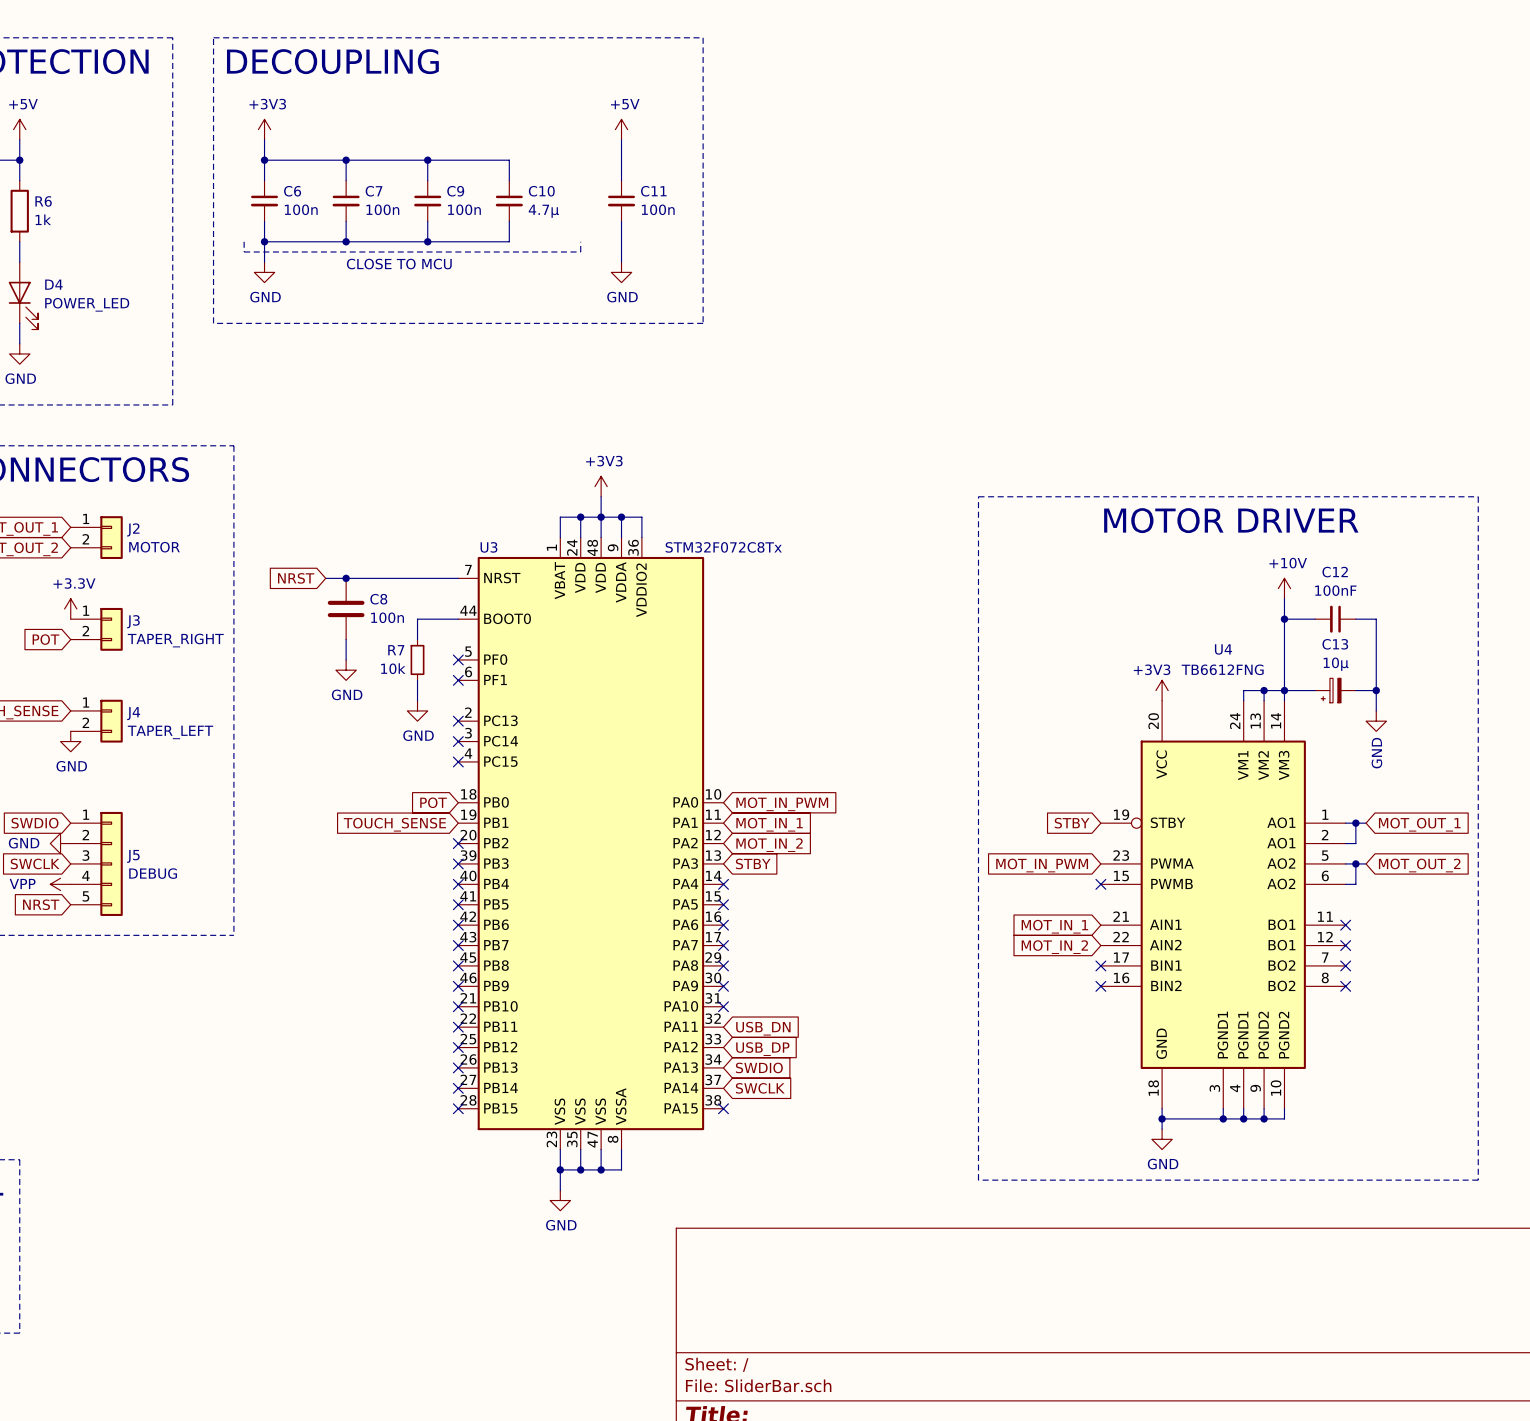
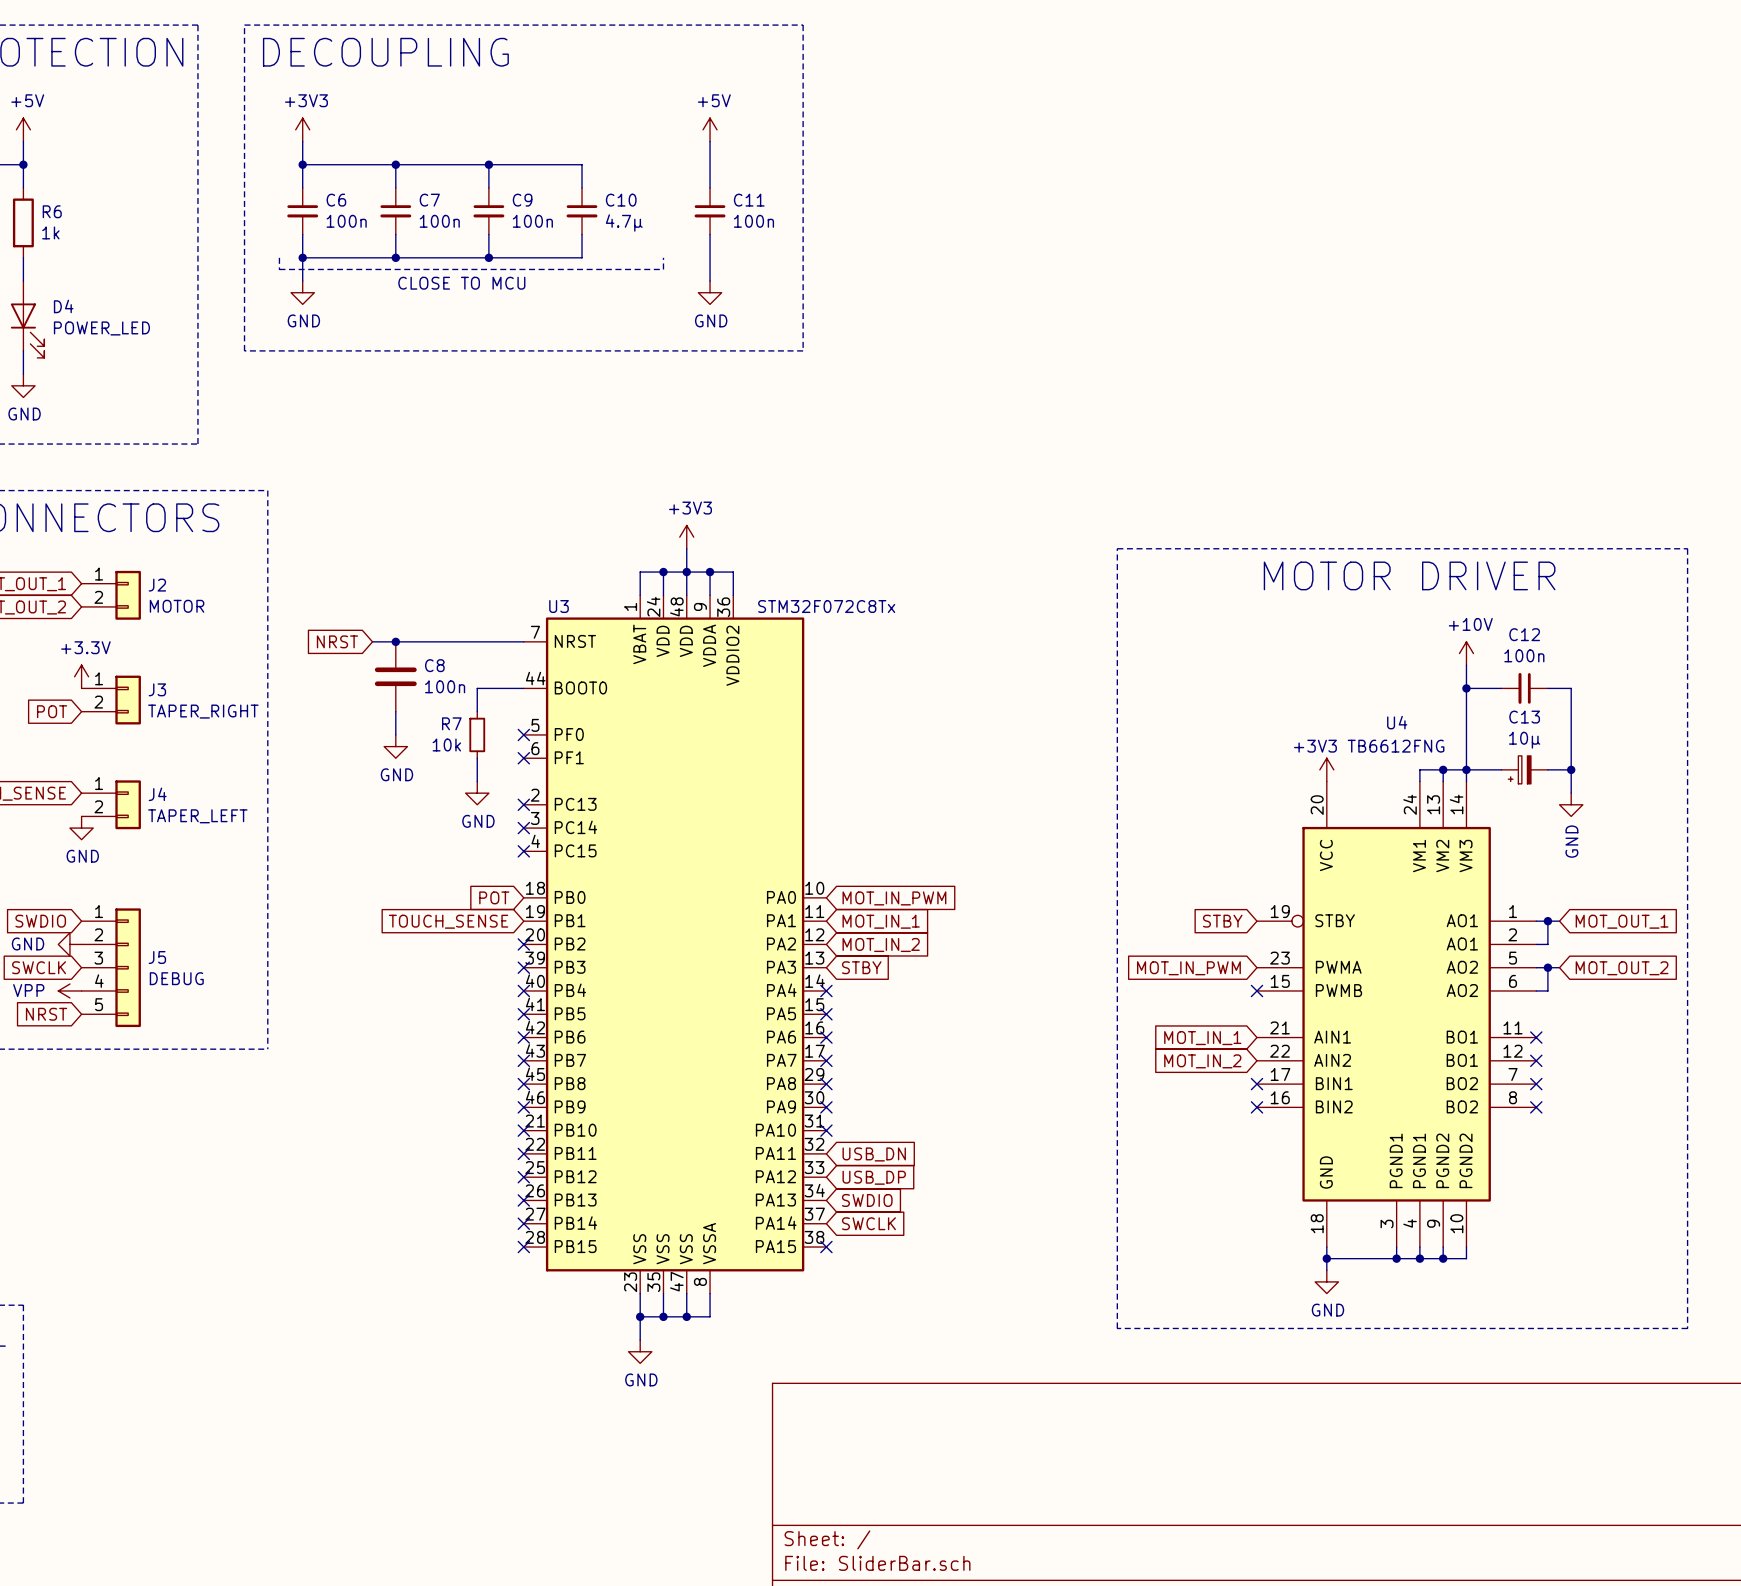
C12 value: 100nF (1335, 590) -> 100n (1524, 655)

